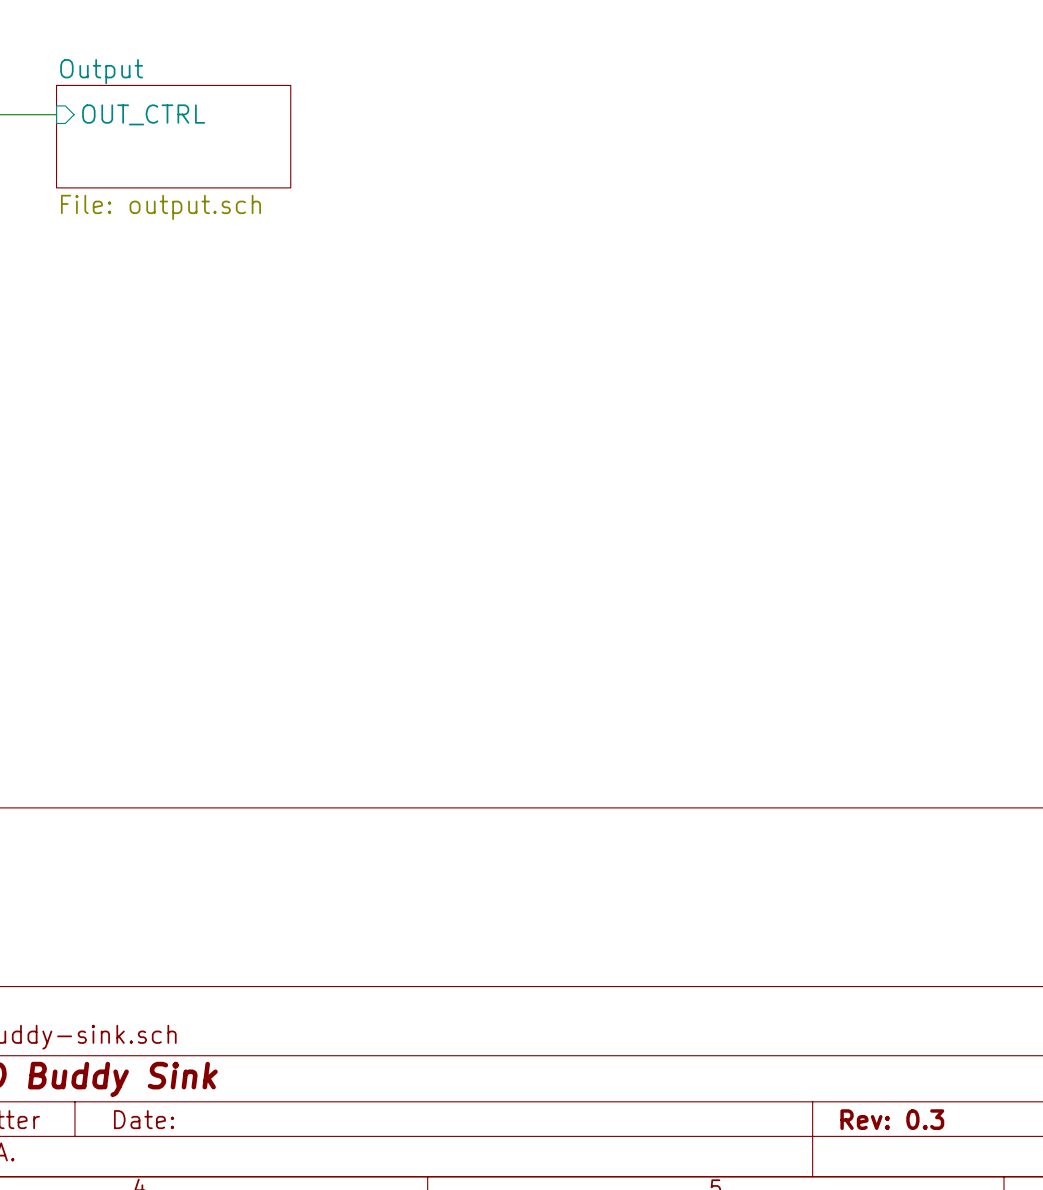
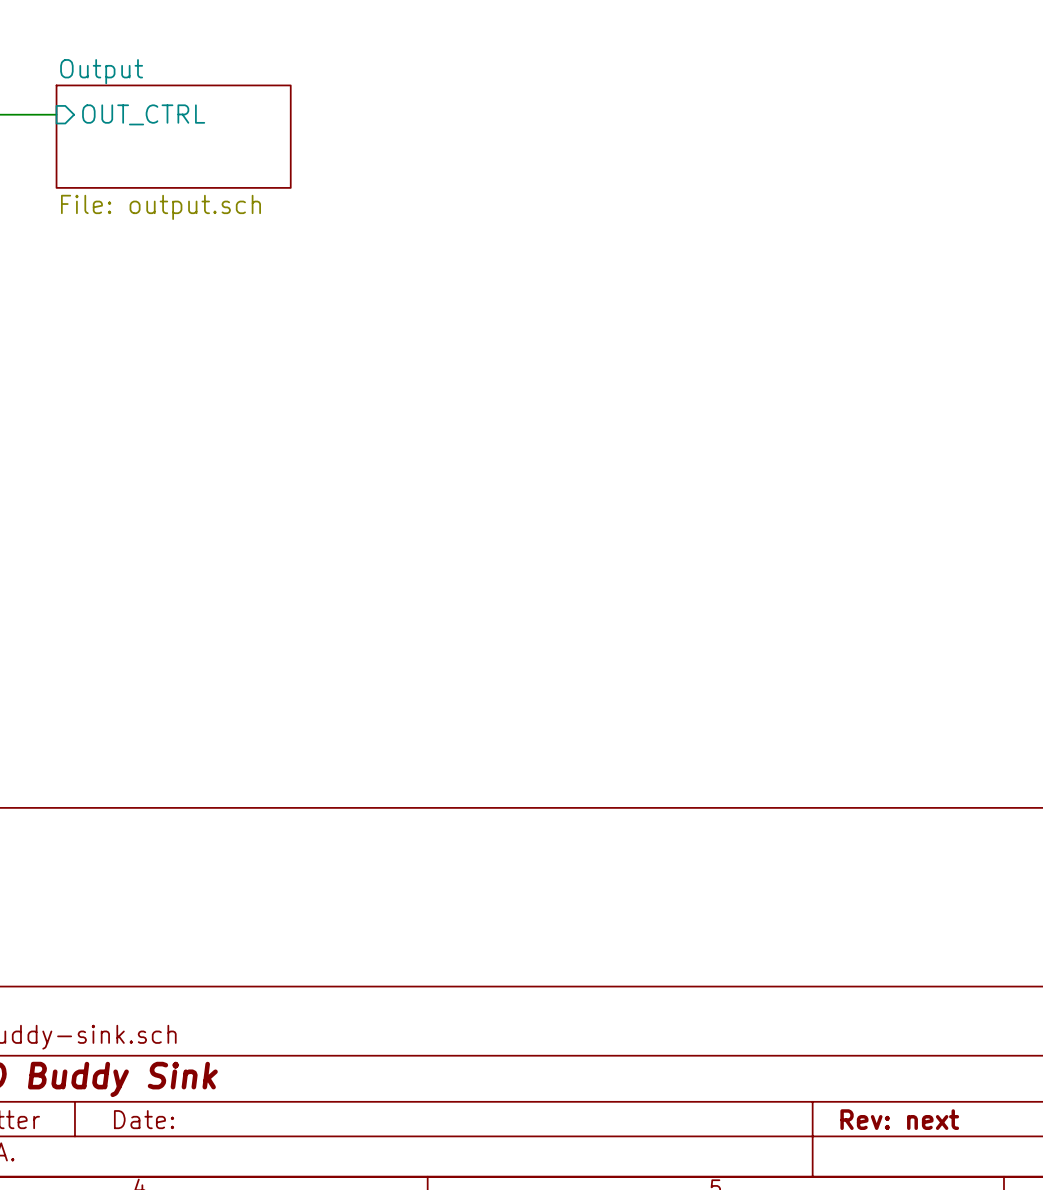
title block: Rev: 0.3 (892, 1119) -> Rev: next (899, 1119)

